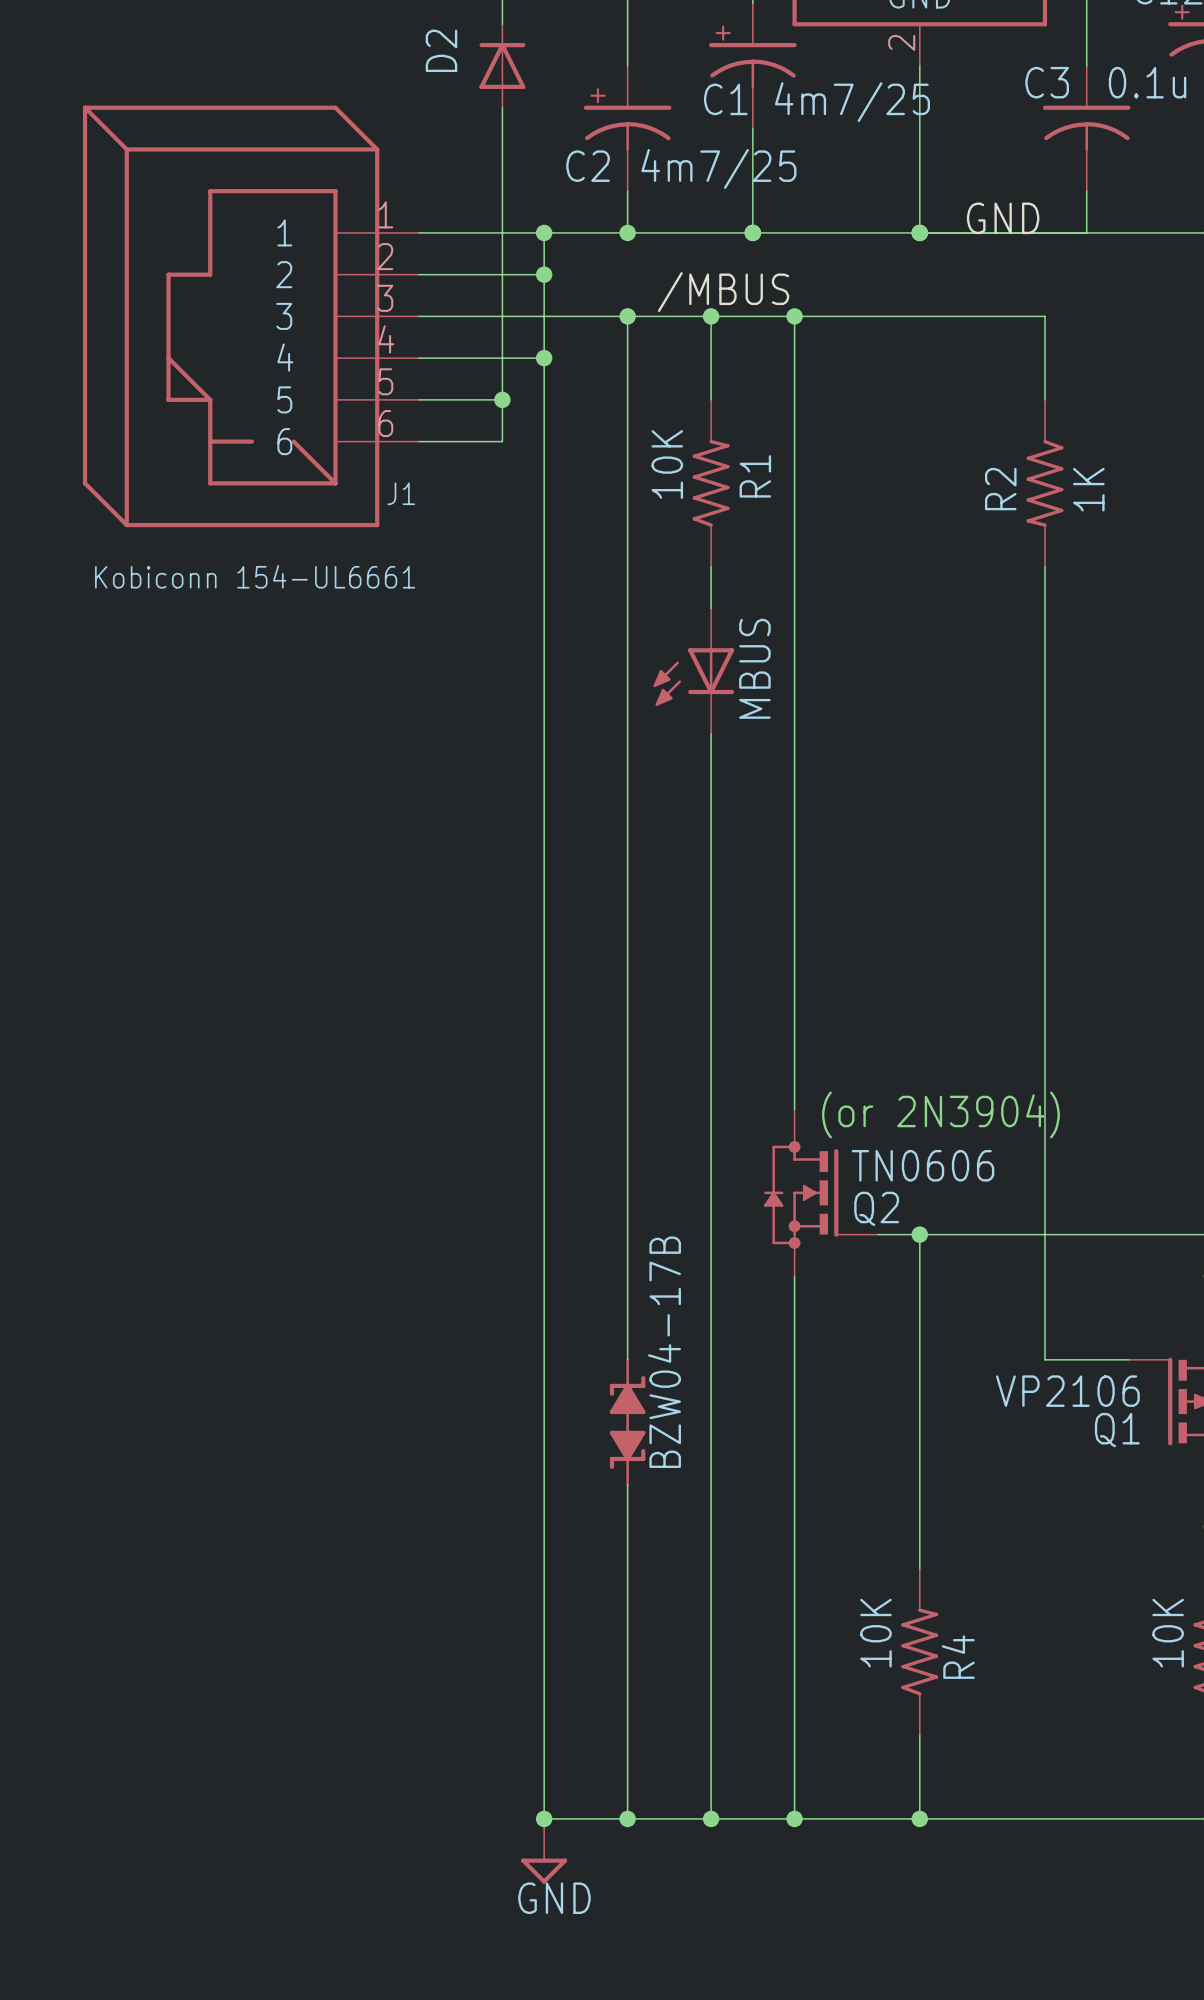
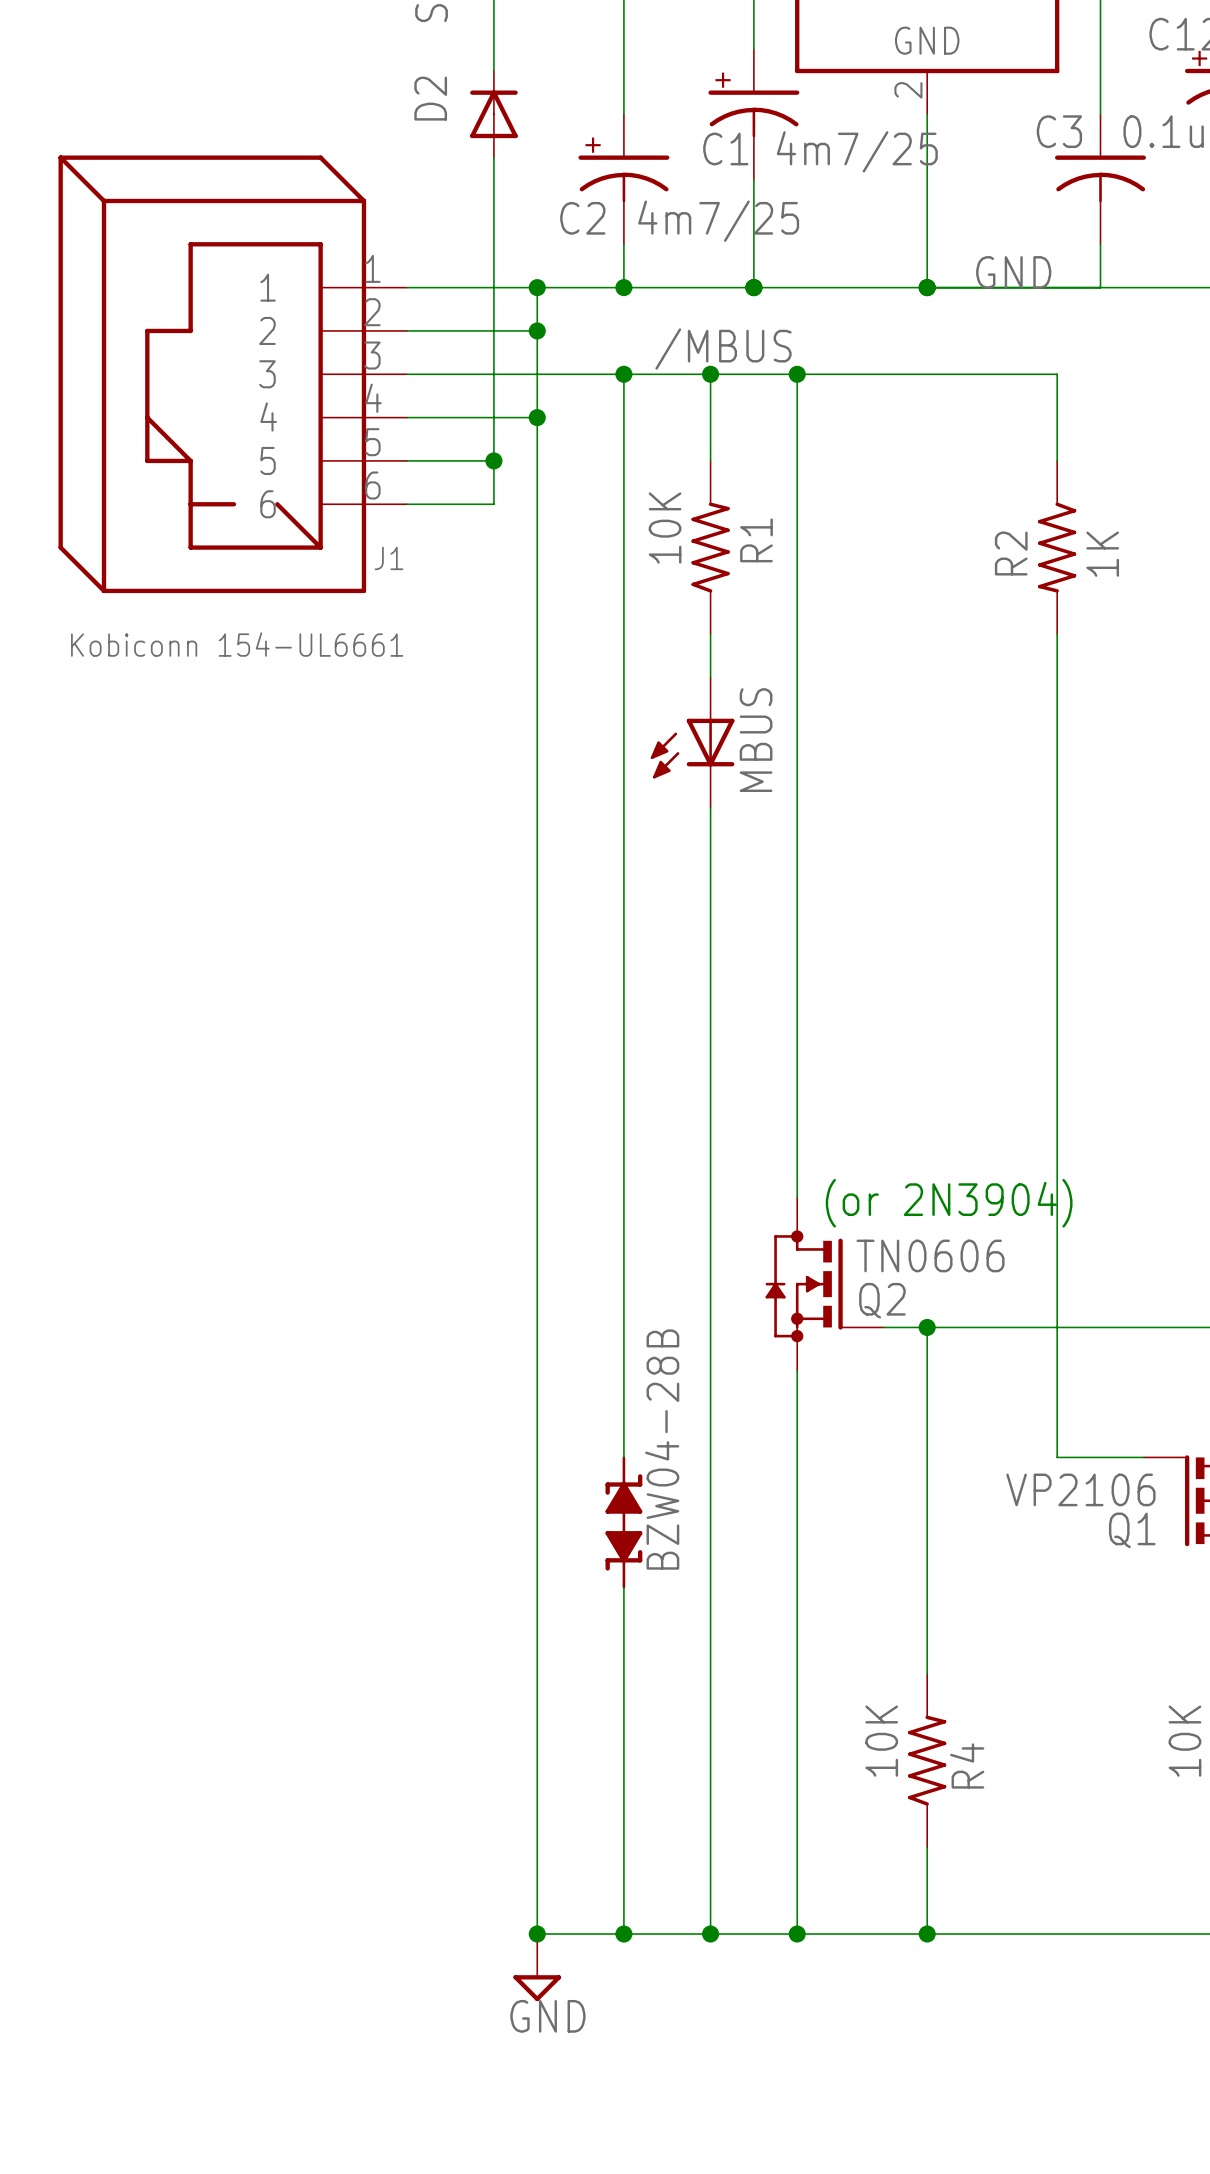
BZW04-17B name: BZW04-17B (664, 1352) -> BZW04-28B (662, 1449)

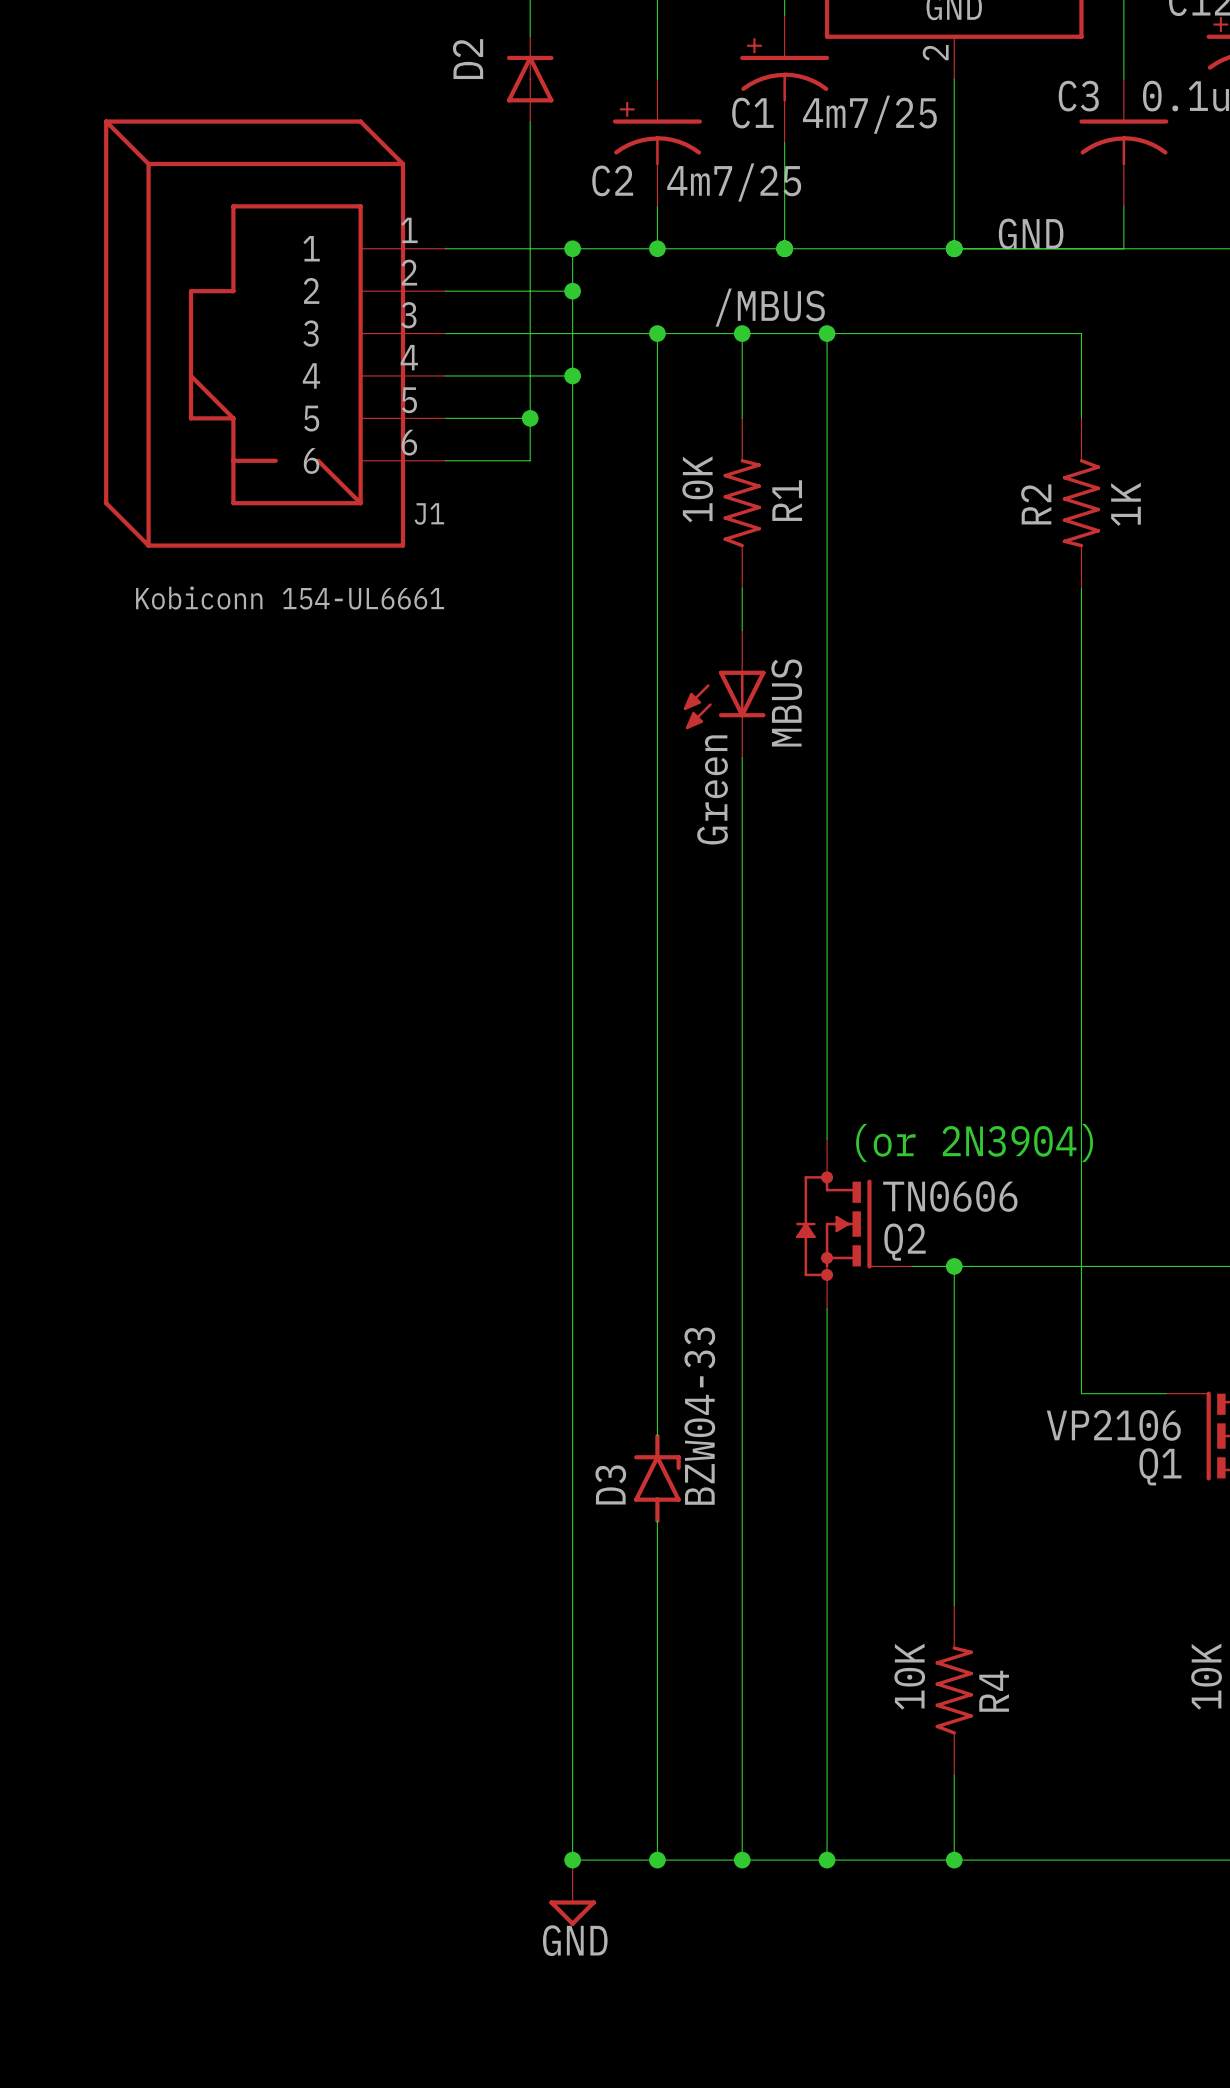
MBUS value: none -> Green (712, 789)
BZW04-28B: (623, 1522) -> none
D3: none -> BZW04-33 (657, 1478)

